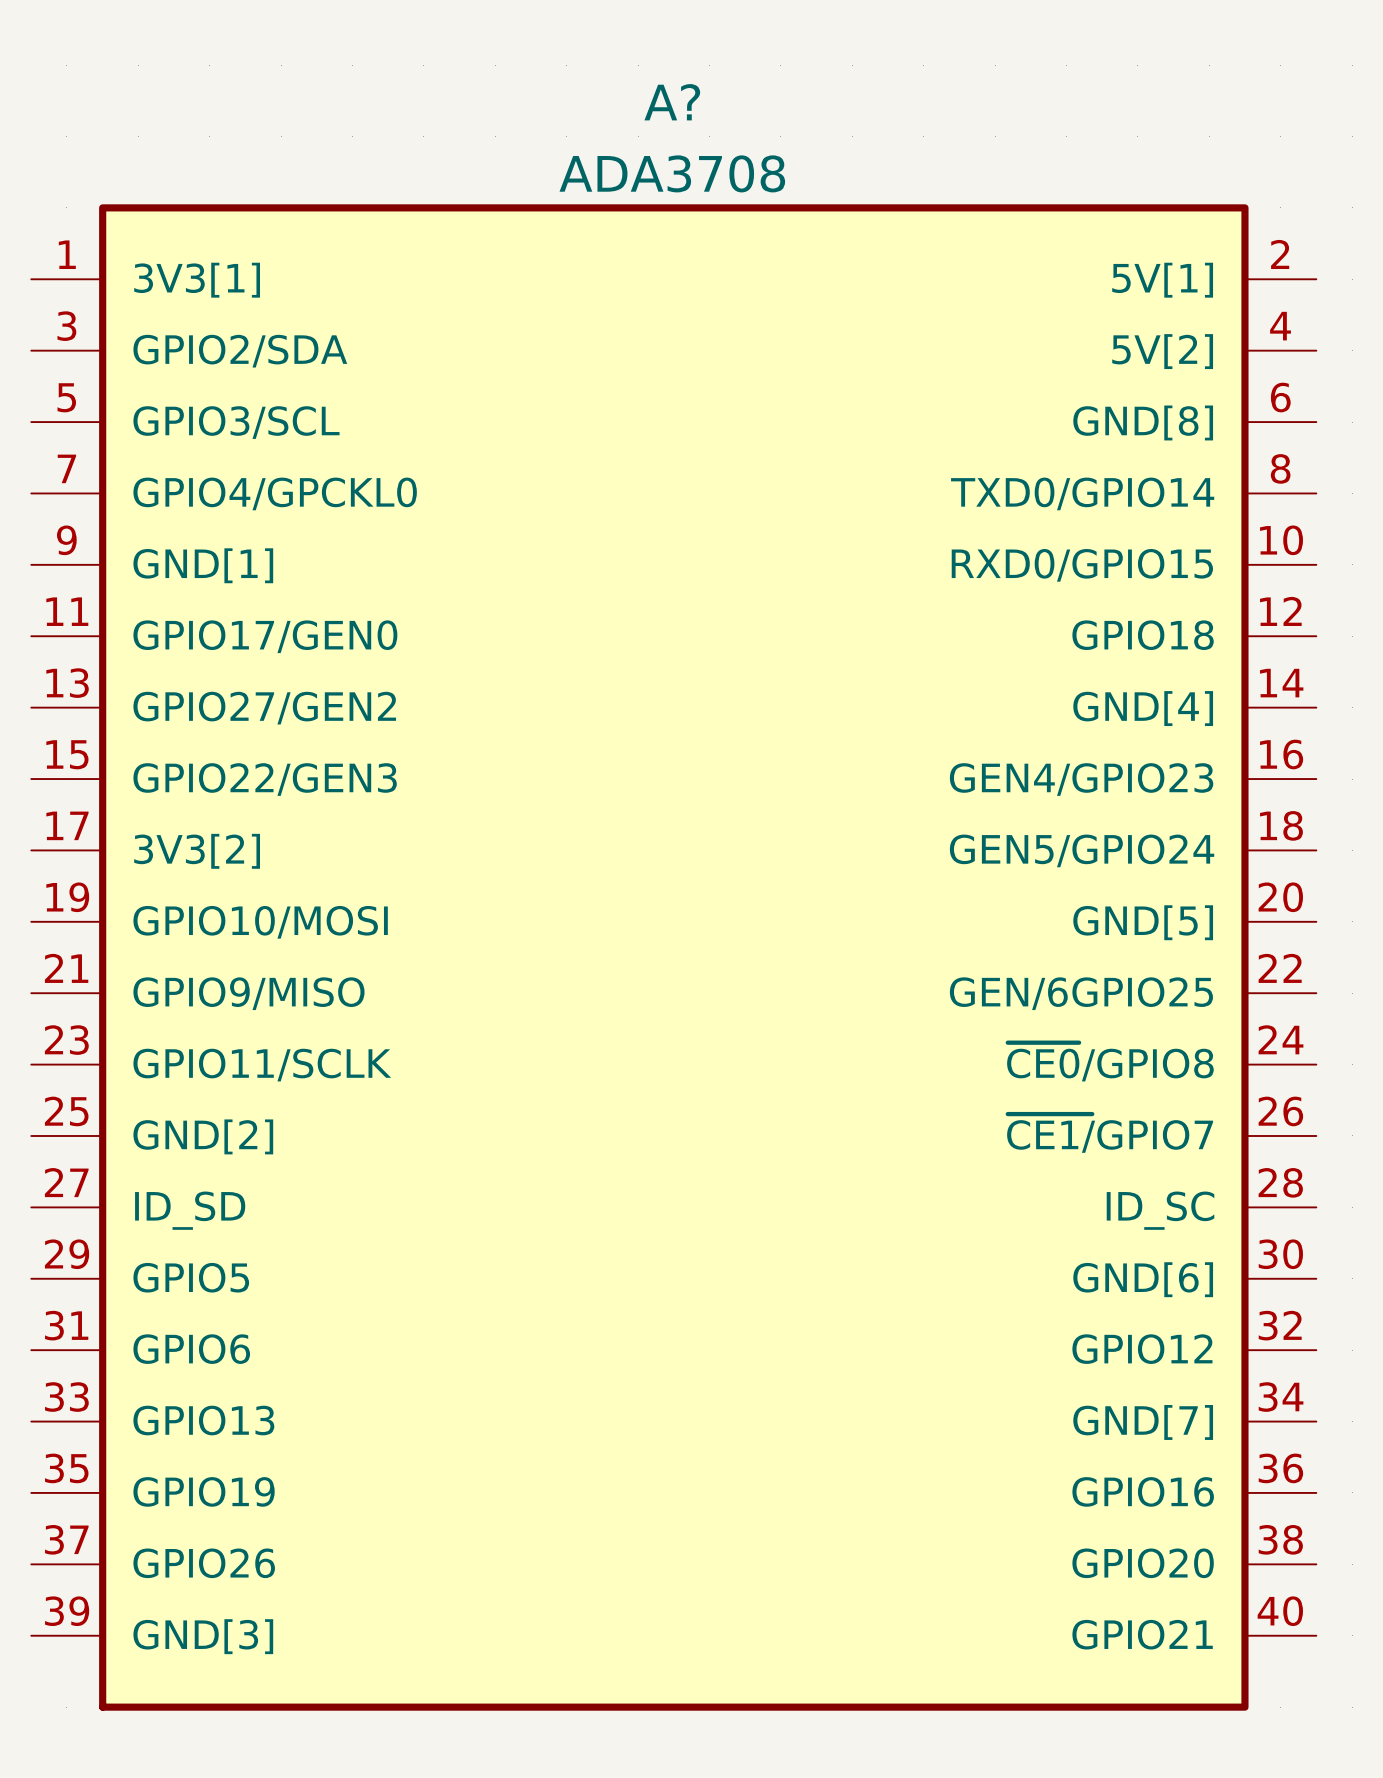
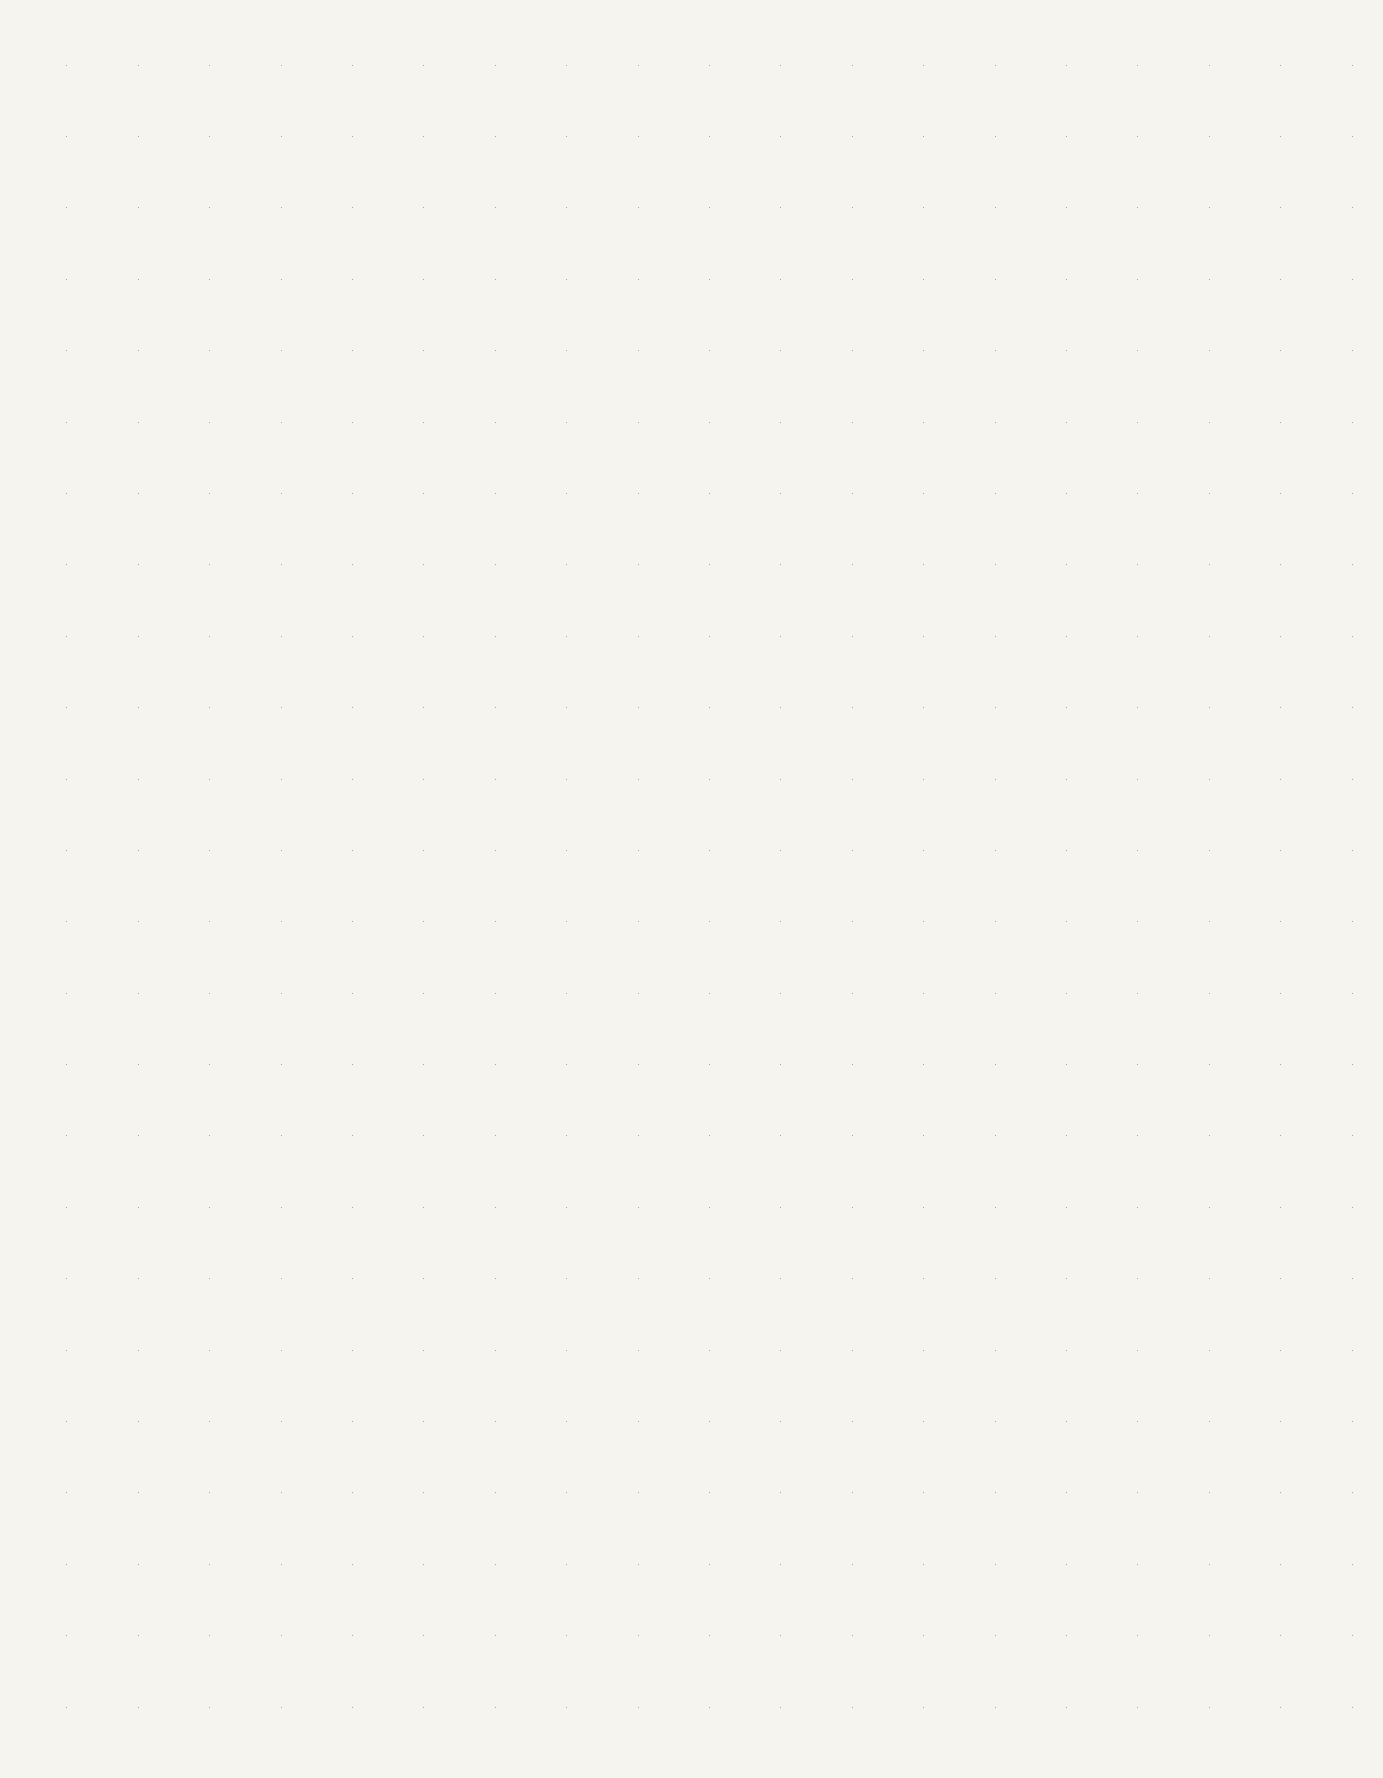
A?: ADA3708 (673, 957) -> none

